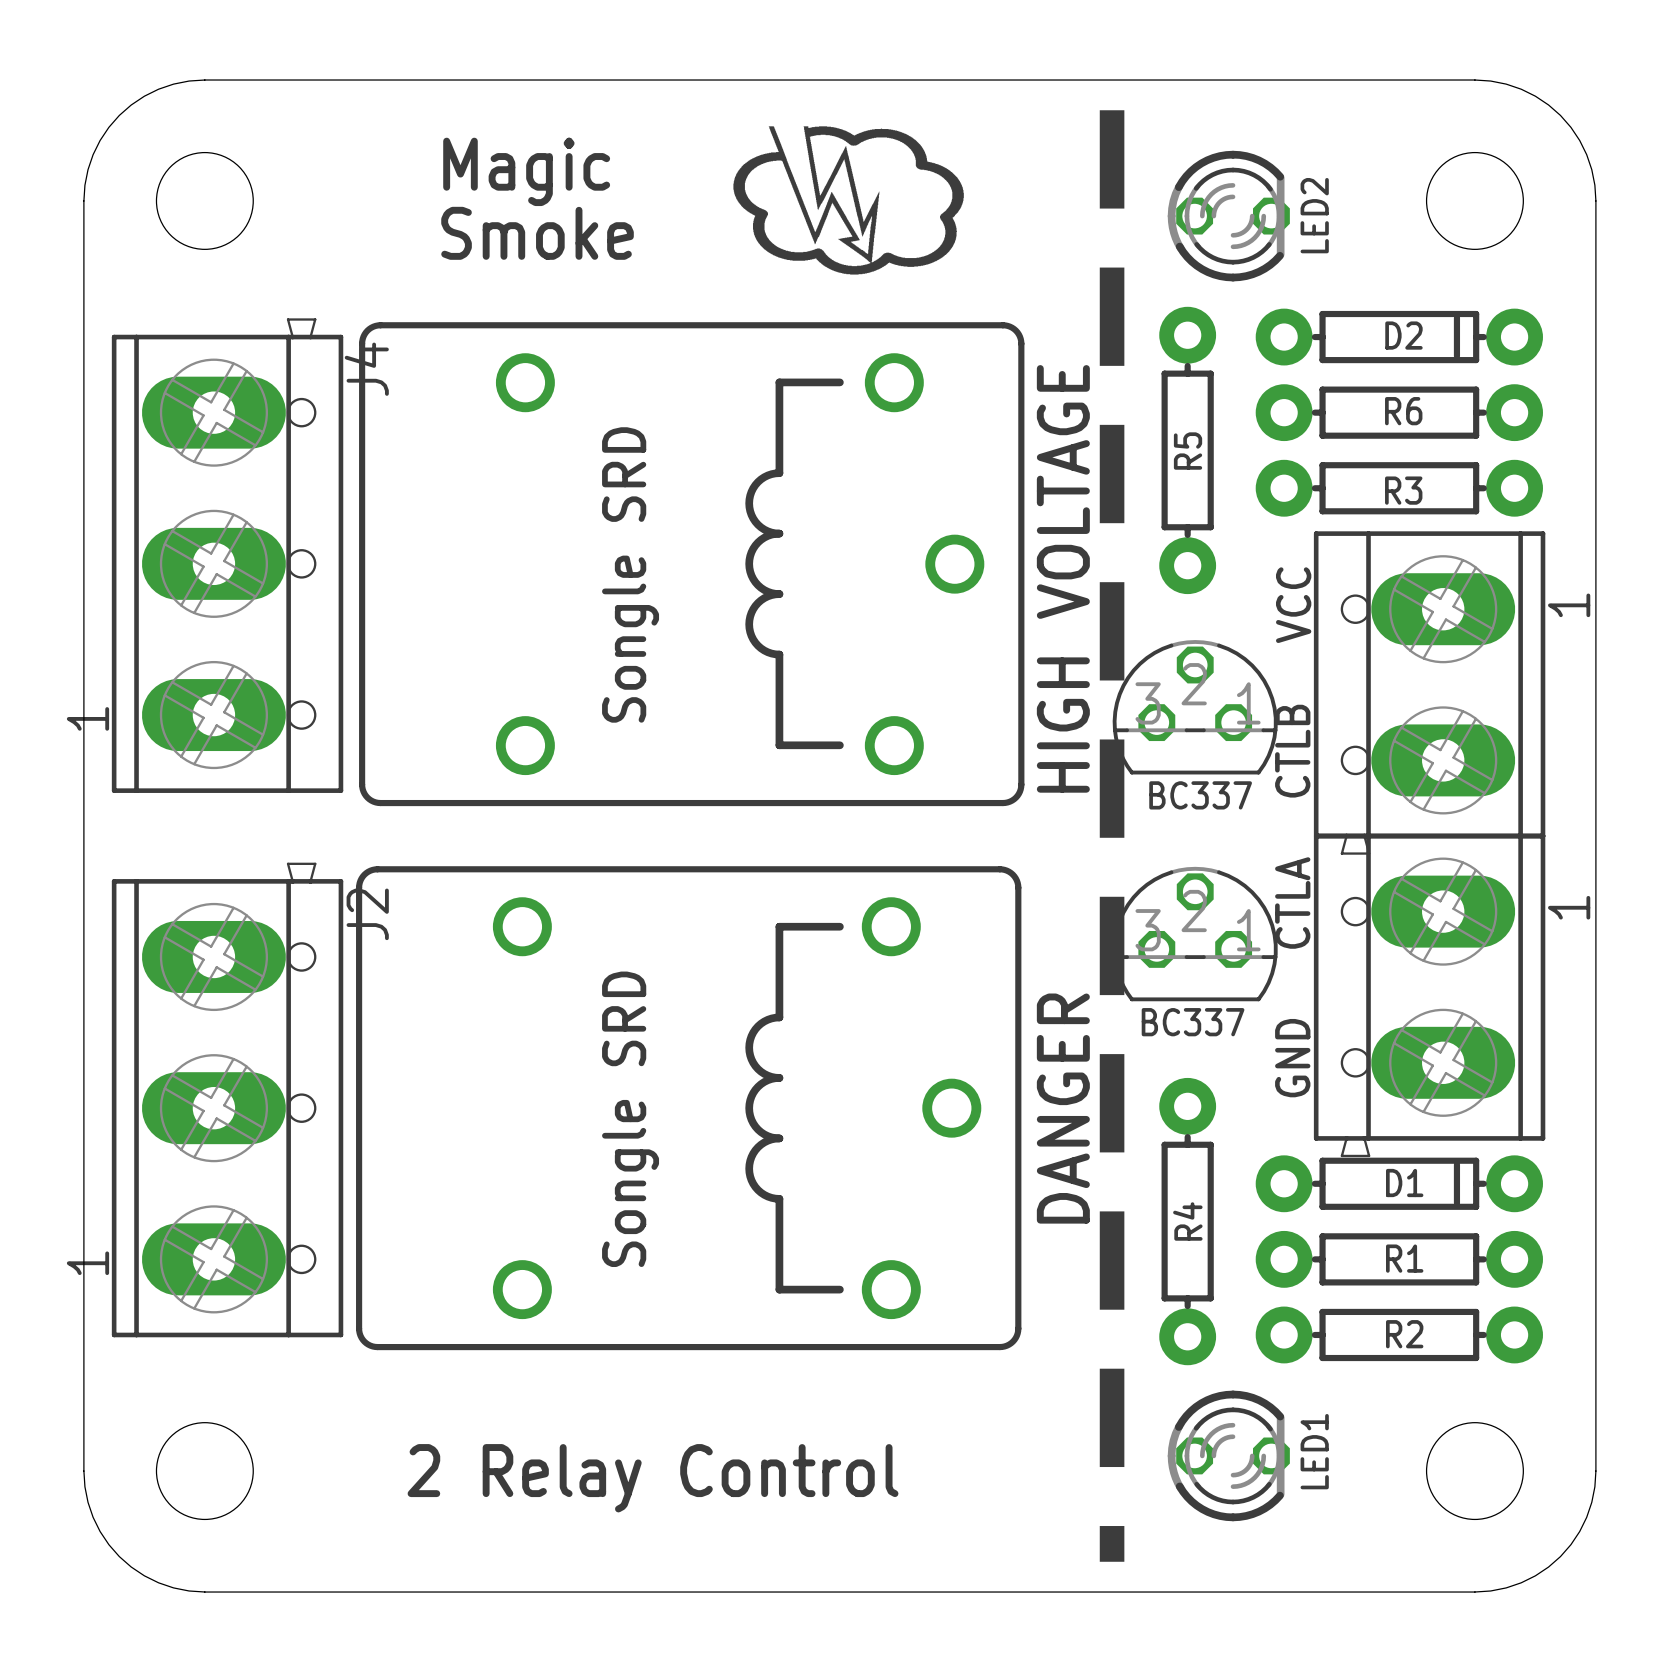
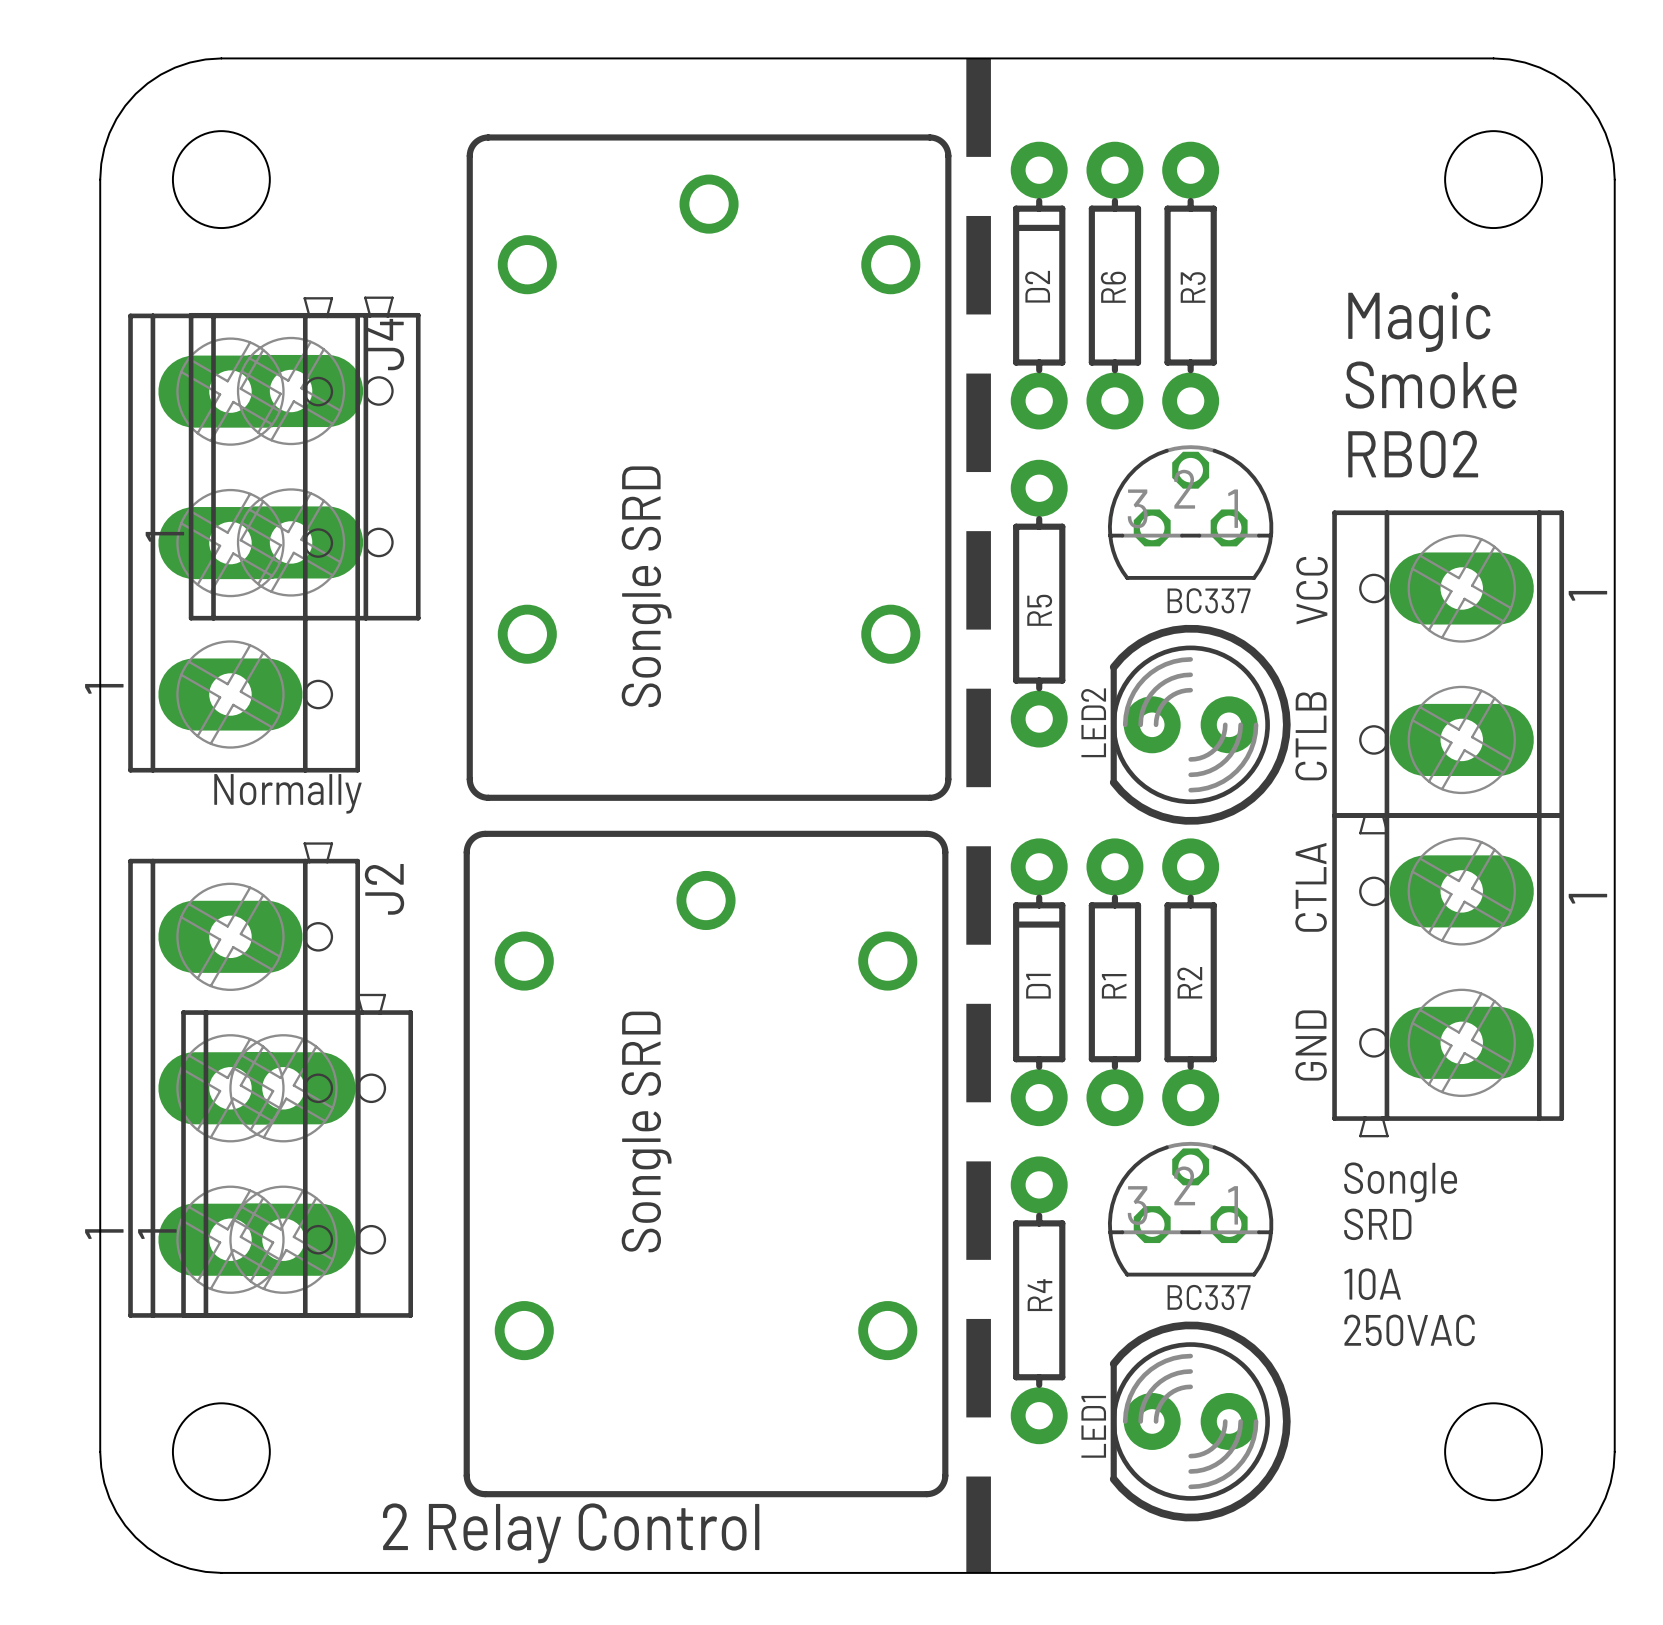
line: none -> (978, 58) (978, 1572)
line: (1112, 110) (1112, 1561) -> none
drawing: [733, 126, 964, 275] -> none
LED2 footprint: [1167, 150, 1290, 282] -> [1109, 624, 1291, 825]
text: Magic (526, 171) -> none
LED2 name position: LED2 (1314, 215) -> LED2 (1093, 722)
text: Smoke (537, 233) -> none
D2 rotation: 0° (1399, 337) -> 90° counterclockwise (1039, 285)
D2 position: (1399, 337) -> (1039, 285)
text: none -> Magic (1419, 322)
line: (839, 382) (779, 382) (779, 473) (767, 475) (758, 481) (751, 491) (749, 503) (751, 514) (758, 524) (767, 531) (779, 533) (767, 535) (758, 542) (751, 552) (749, 563) (751, 575) (758, 585) (767, 591) (779, 594) (767, 596) (758, 602) (751, 612) (749, 624) (751, 635) (758, 645) (767, 652) (779, 654) (779, 745) (839, 745) -> none
text: none -> Smoke (1431, 385)
R6 rotation: 0° (1399, 412) -> 90° clockwise (1114, 285)
R6 position: (1399, 412) -> (1114, 285)
R5 position: (1187, 450) -> (1039, 603)
text: none -> RB02 (1413, 454)
part: none -> (304, 458)
R3 rotation: 0° (1399, 488) -> 90° clockwise (1190, 285)
R3 position: (1399, 488) -> (1190, 285)
part rotation: 0° (691, 564) -> 90° counterclockwise (709, 467)
text: HIGH VOLTAGE (1063, 578) -> none
part position: (1195, 707) -> (1190, 512)
text: none -> Normally (288, 793)
line: (839, 926) (779, 926) (779, 1017) (767, 1019) (758, 1026) (751, 1036) (749, 1047) (751, 1059) (758, 1069) (767, 1075) (779, 1077) (767, 1080) (758, 1086) (751, 1096) (749, 1108) (751, 1119) (758, 1129) (767, 1136) (779, 1138) (767, 1140) (758, 1147) (751, 1157) (749, 1168) (751, 1180) (758, 1190) (767, 1196) (779, 1198) (779, 1289) (839, 1289) -> none
part: BC337 (1195, 934) -> none
part rotation: 0° (688, 1108) -> 90° counterclockwise (706, 1164)
text: DANGER (1063, 1108) -> none
part: none -> (297, 1155)
D1 rotation: 0° (1399, 1183) -> 90° counterclockwise (1039, 982)
D1 position: (1399, 1183) -> (1039, 982)
text: none -> Songle (1400, 1182)
R4 position: (1187, 1221) -> (1039, 1300)
part: none -> BC337 (1190, 1209)
text: none -> SRD (1377, 1224)
R1 rotation: 0° (1399, 1259) -> 90° clockwise (1114, 982)
R1 position: (1399, 1259) -> (1114, 982)
text: none -> 10A (1372, 1284)
R2 rotation: 0° (1399, 1334) -> 90° clockwise (1190, 982)
R2 position: (1399, 1334) -> (1190, 982)
text: none -> 250VAC (1409, 1330)
LED1 footprint: [1167, 1390, 1290, 1522] -> [1109, 1321, 1291, 1522]
LED1 name position: LED1 (1314, 1451) -> LED1 (1093, 1426)
text position: 2 Relay Control (653, 1478) -> 2 Relay Control (571, 1533)

